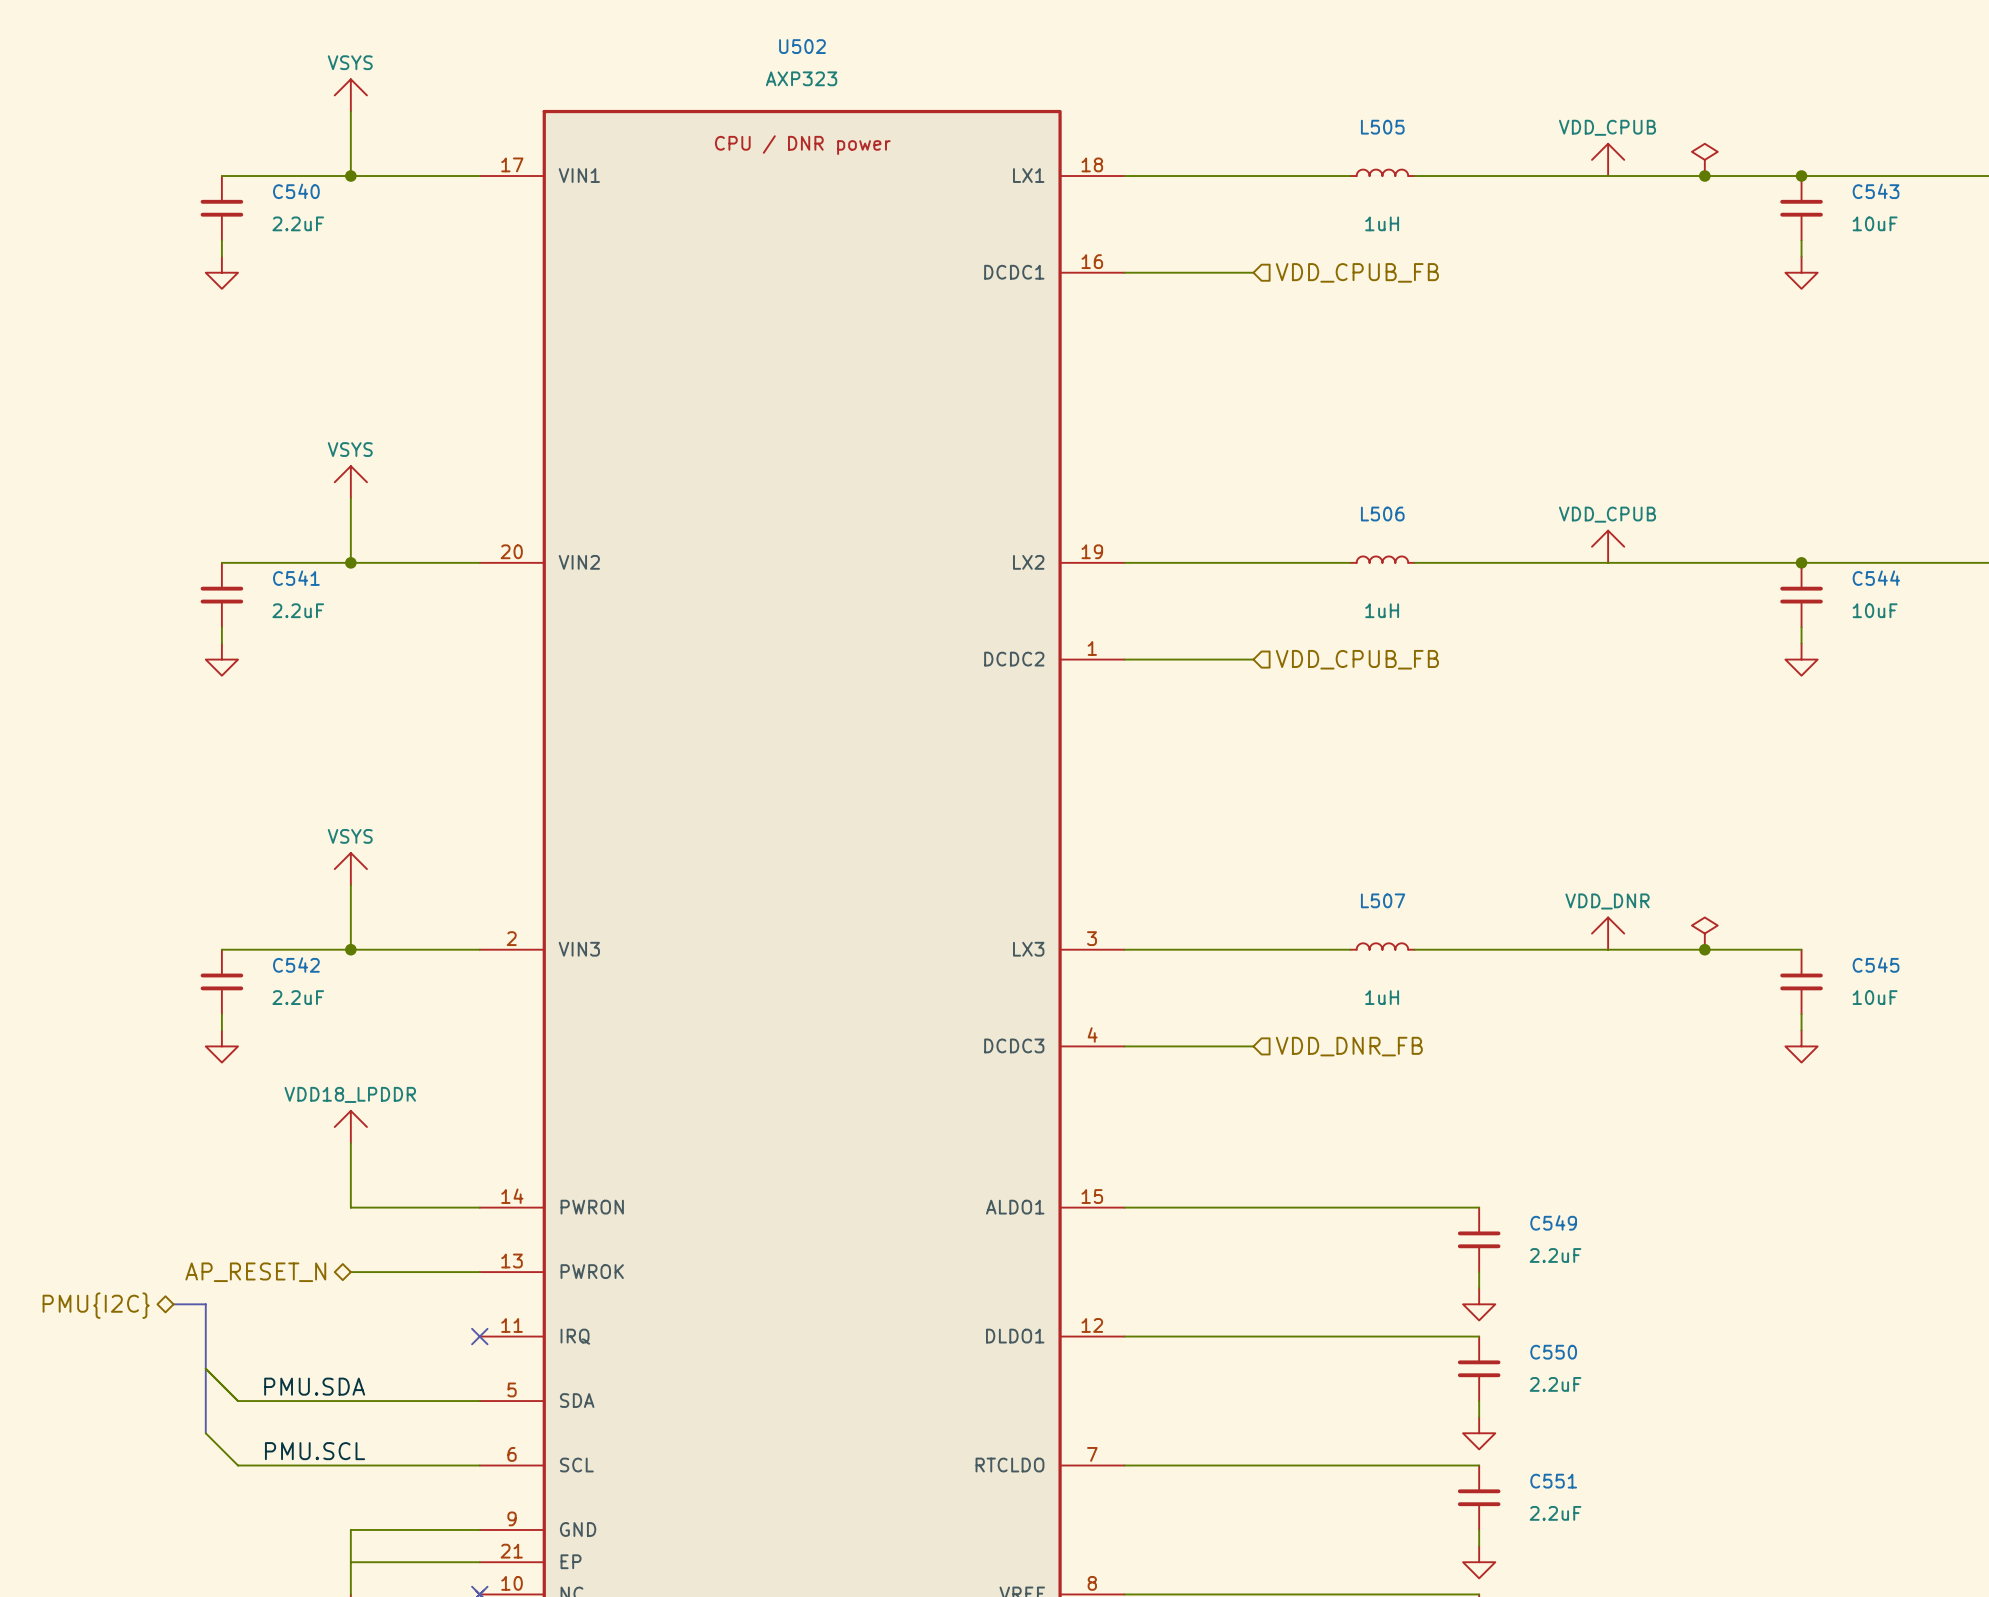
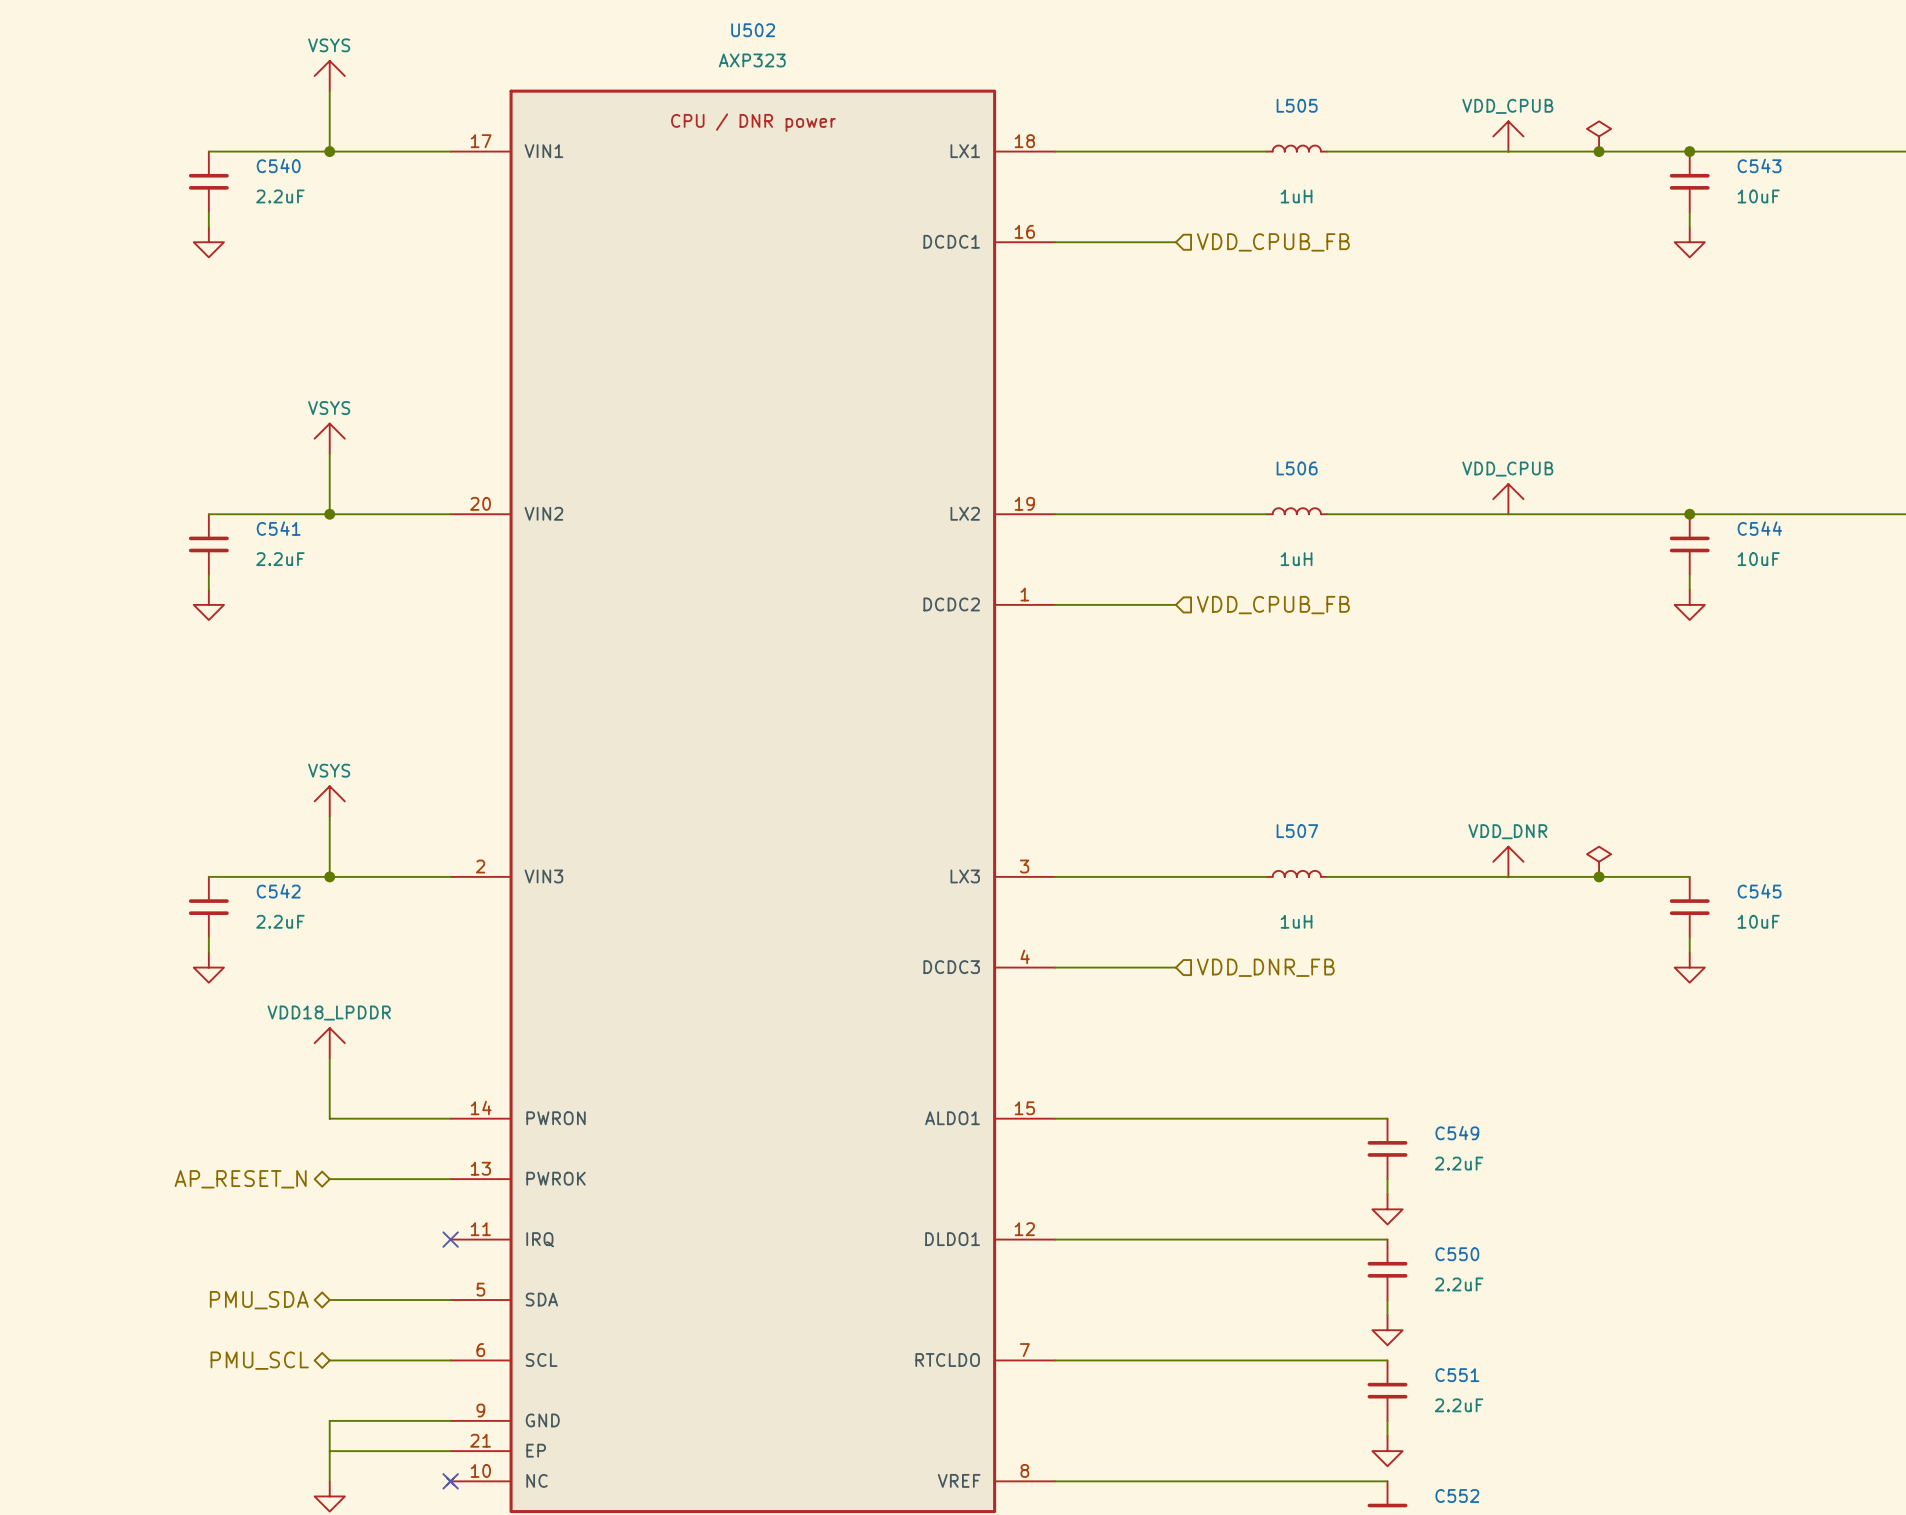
bus: (173, 1304) (205, 1304) (205, 1433) -> none
hierarchical label: PMU{I2C} (96, 1305) -> none
wire: (205, 1368) (238, 1401) (350, 1401) -> none
label: PMU.SDA (314, 1386) -> none
hierarchical label: none -> PMU_SDA (259, 1300)
wire: (205, 1433) (238, 1465) (350, 1465) -> none
label: PMU.SCL (315, 1451) -> none
hierarchical label: none -> PMU_SCL (259, 1360)

